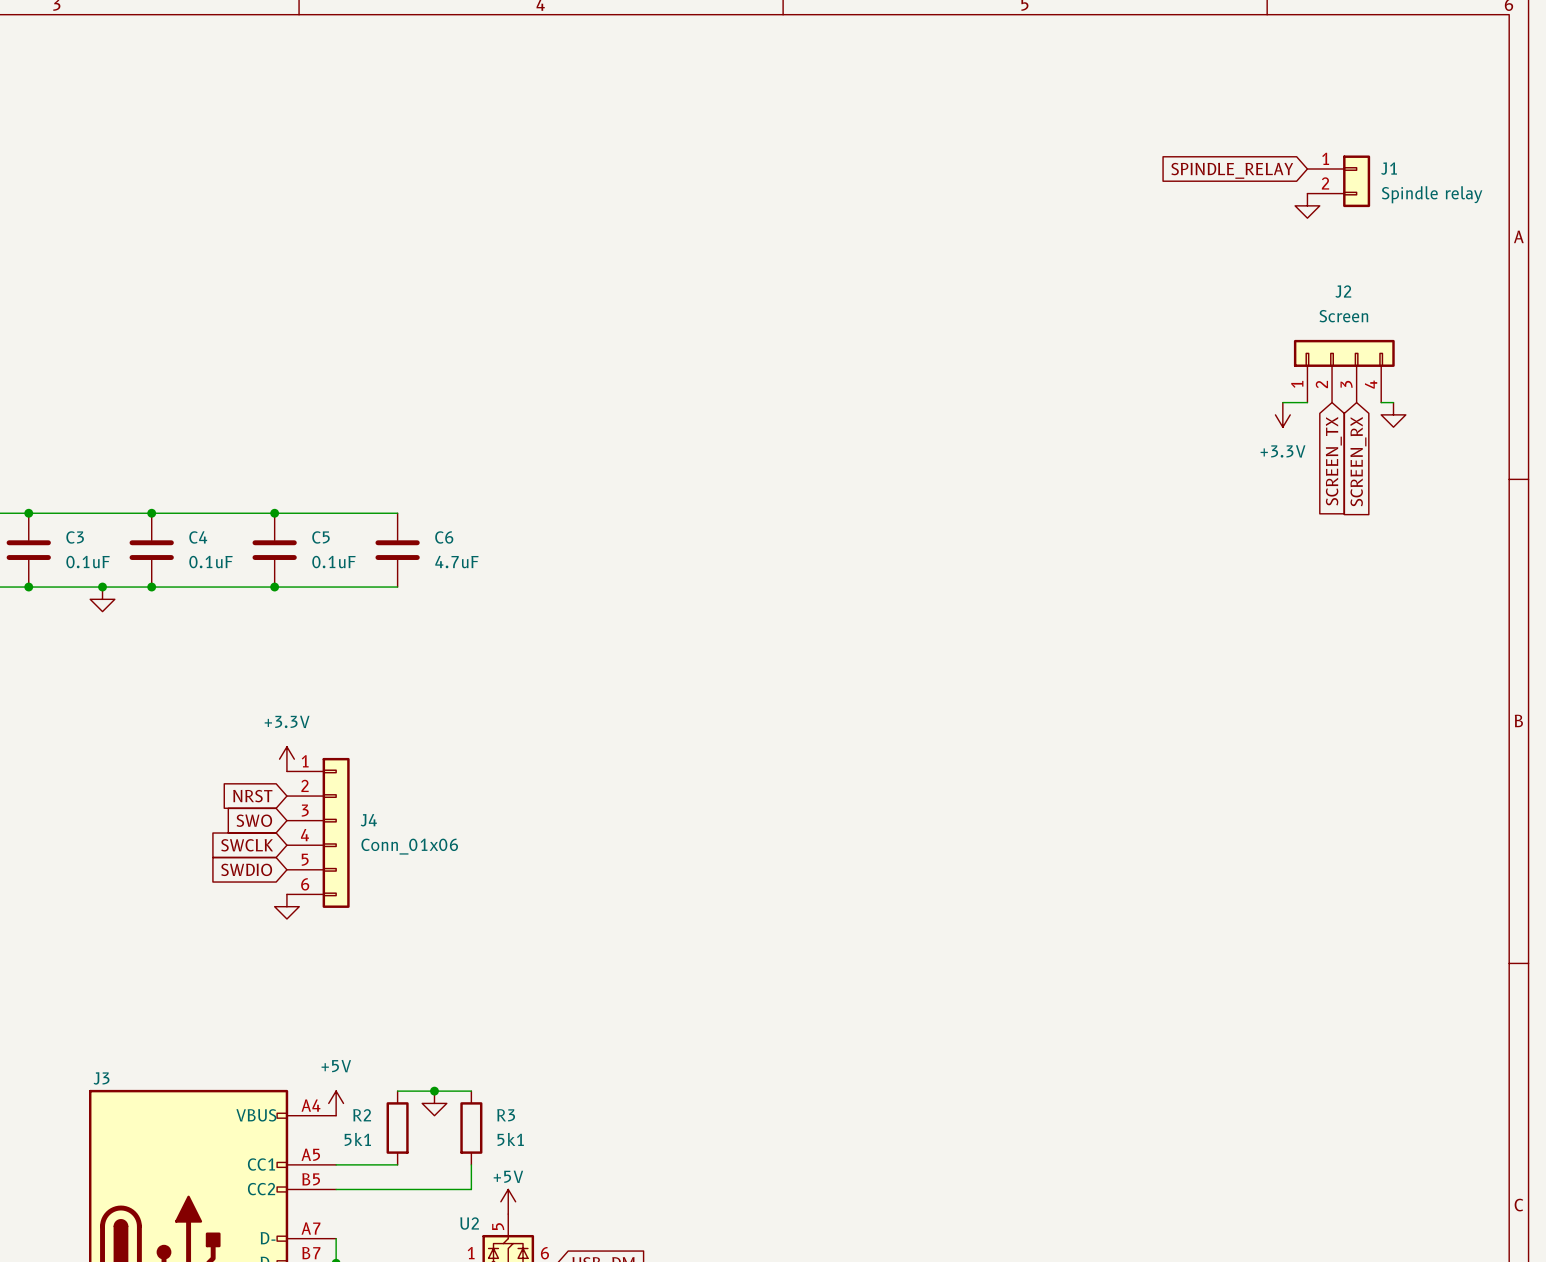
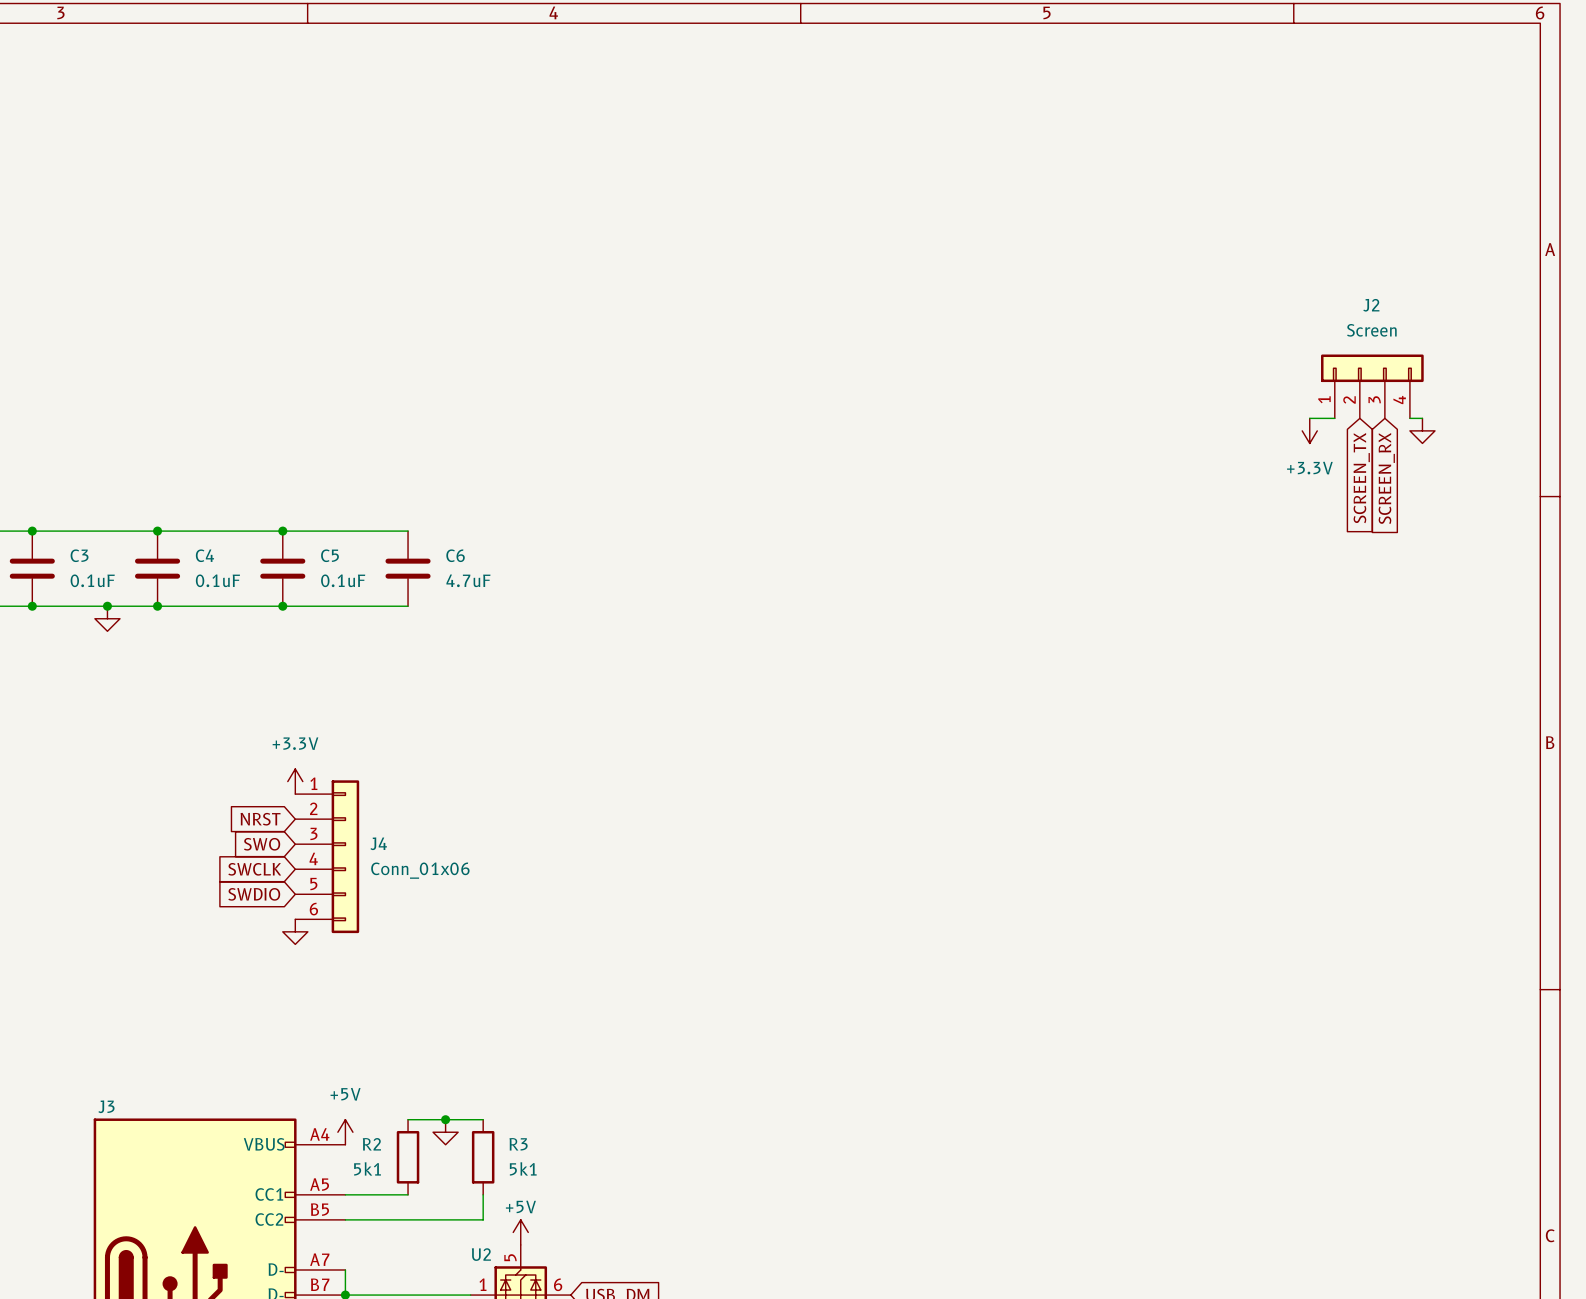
global label: SPINDLE_RELAY (1232, 170) -> none
J1: Spindle relay (1338, 181) -> none
power symbol: (1307, 205) -> none

